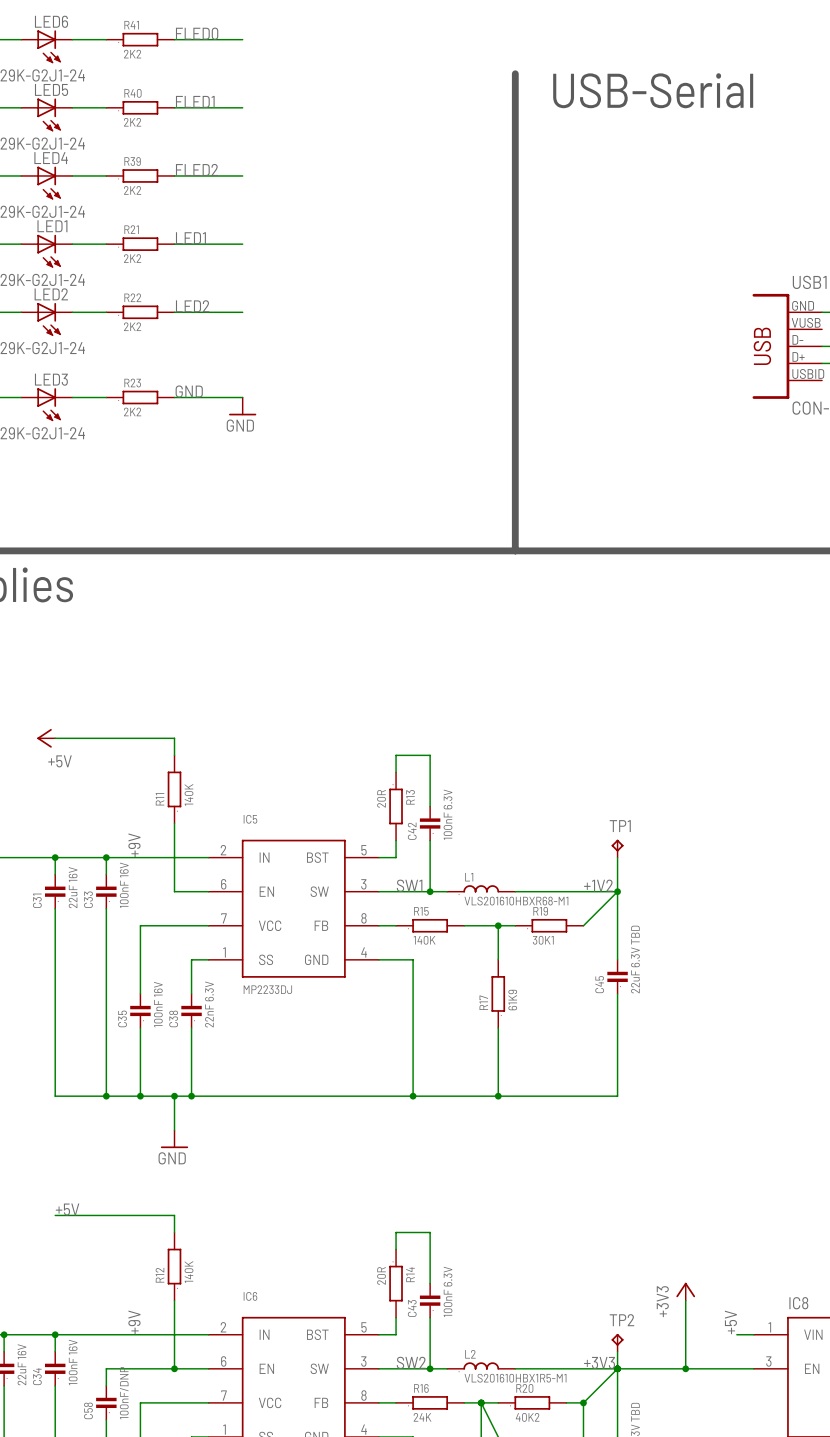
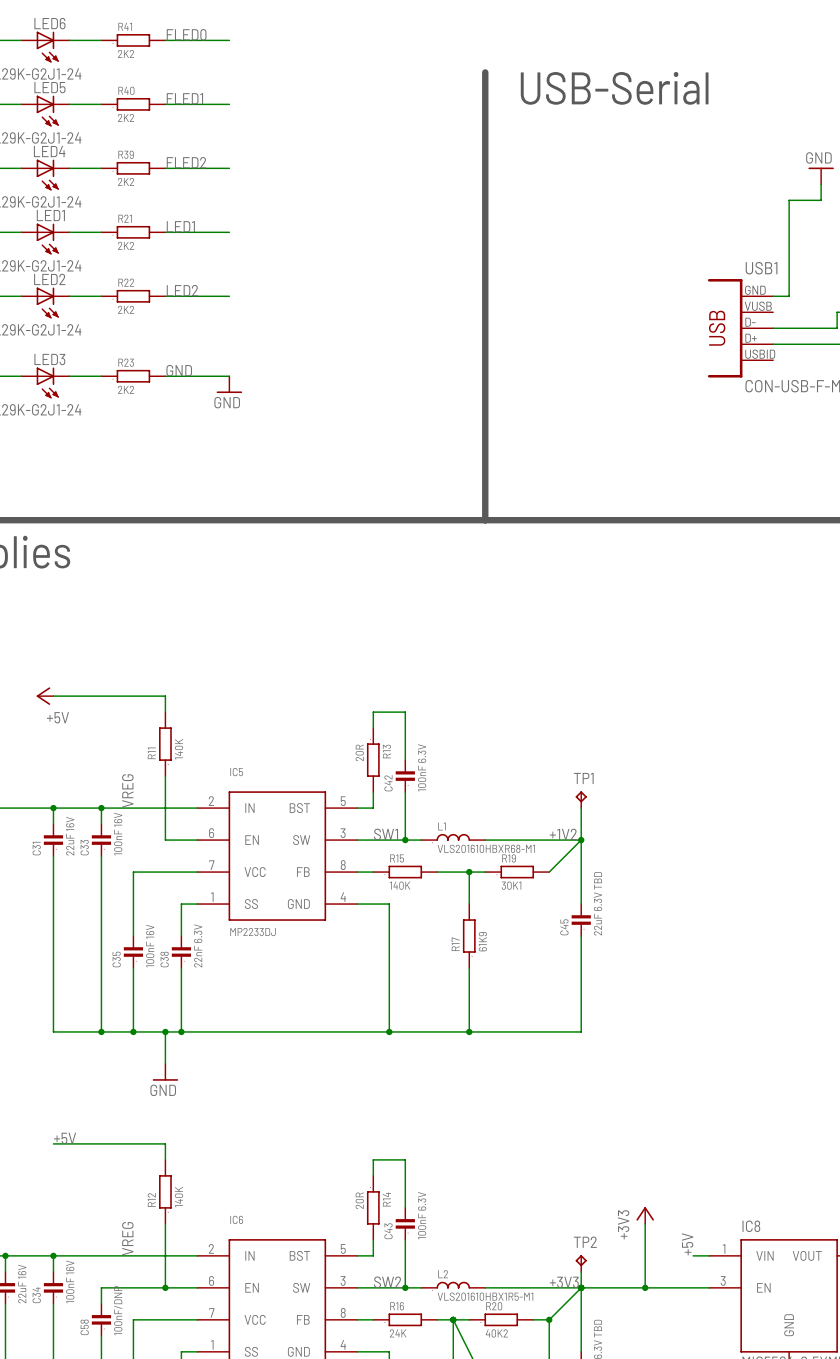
label: +9V (134, 845) -> VREG (127, 790)
label: +9V (134, 1322) -> VREG (127, 1238)

